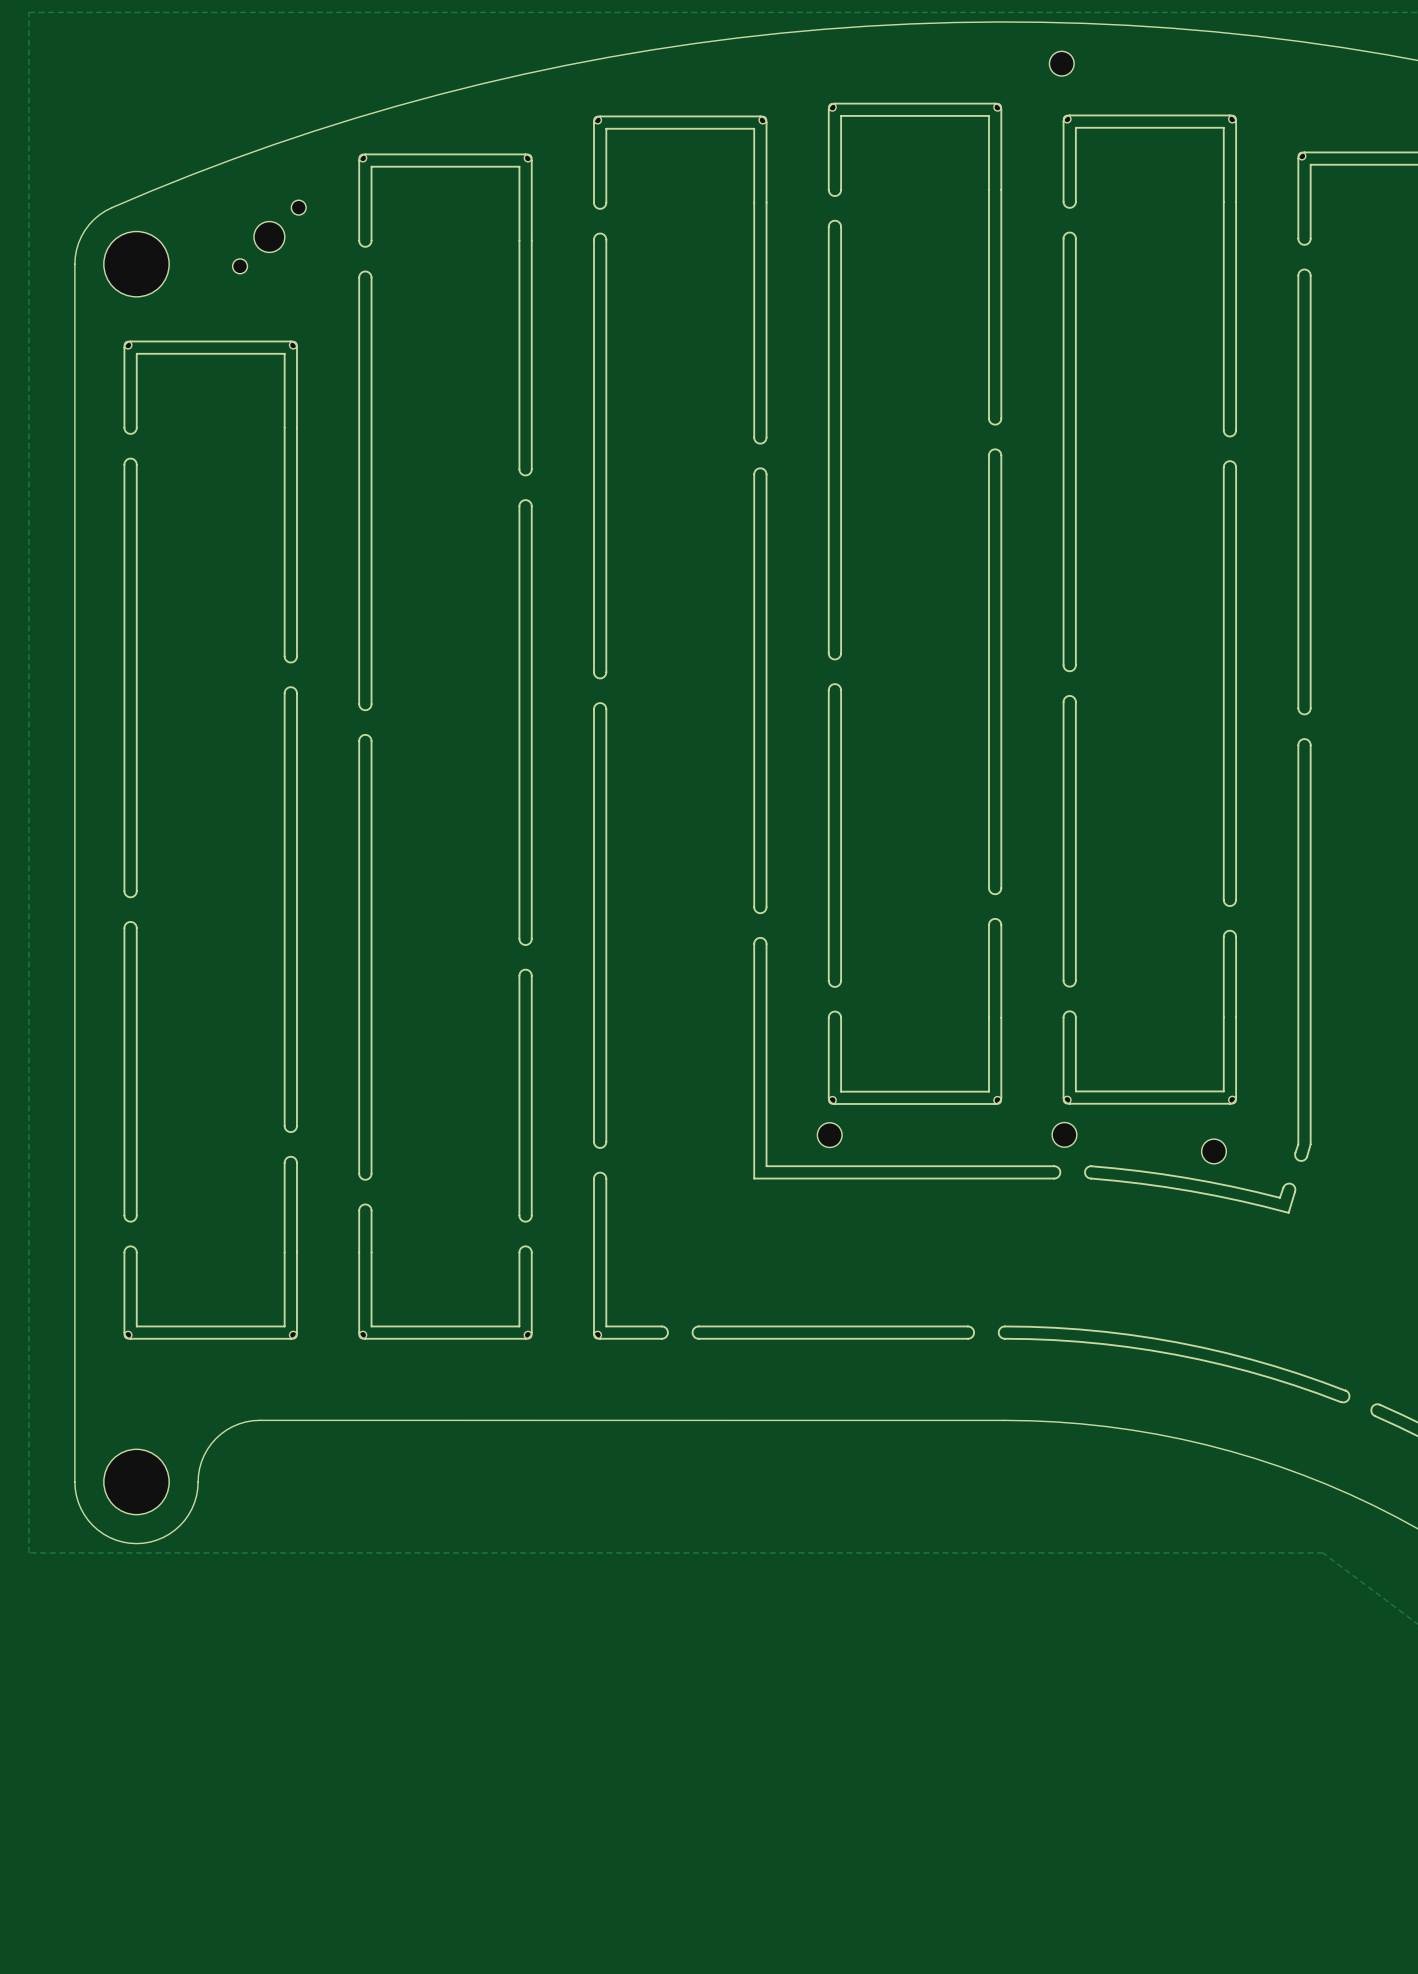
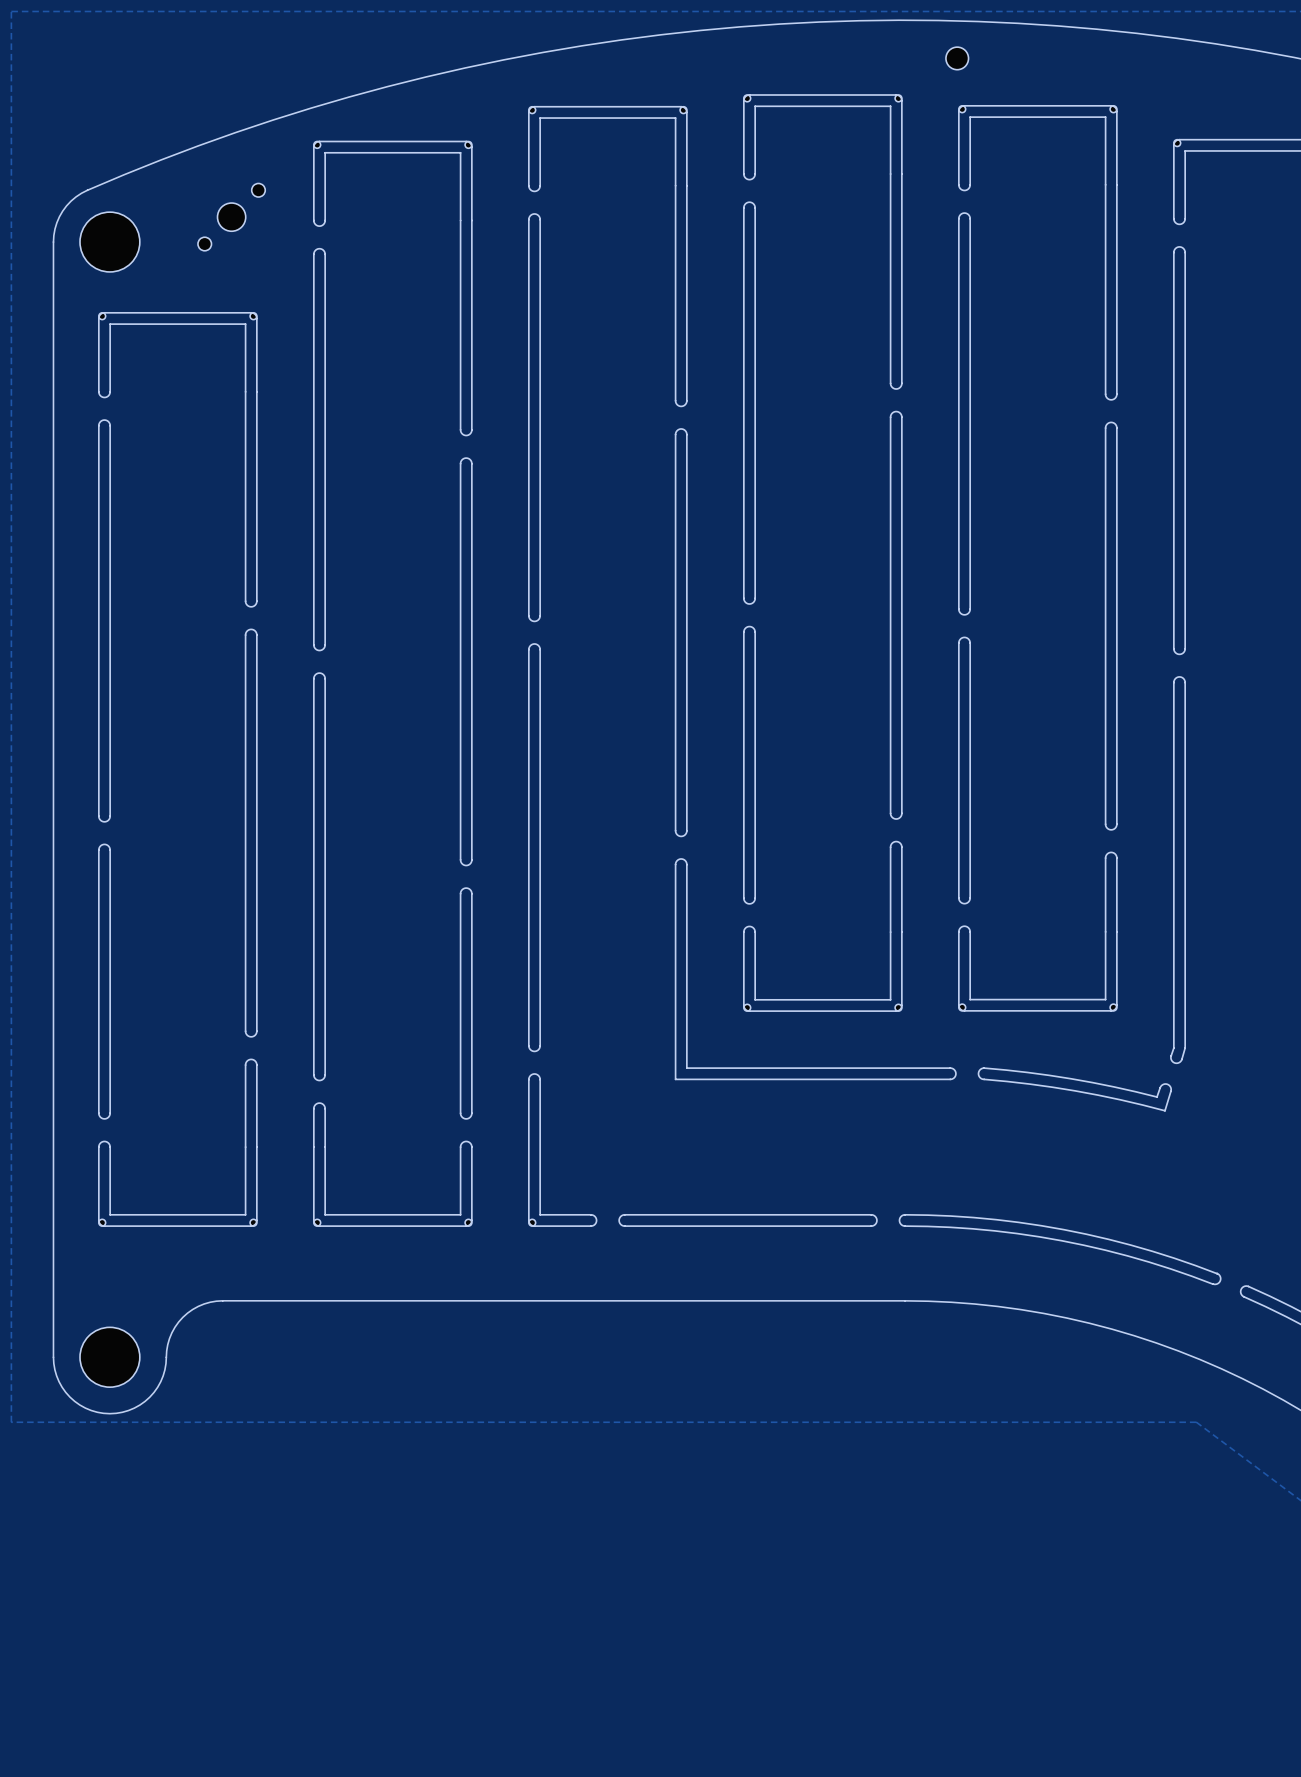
part: (1064, 1134) -> none
part: (829, 1135) -> none
part: (1213, 1151) -> none

